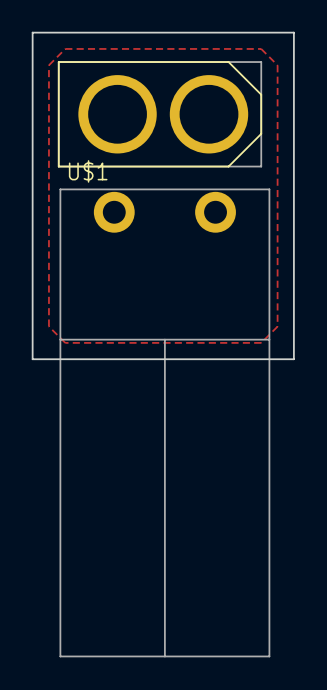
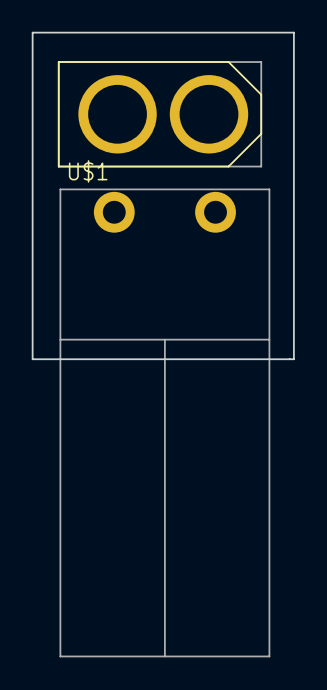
zone outline: (65, 48) (261, 48) (277, 65) (277, 326) (261, 342) (65, 342) (48, 326) (48, 65) (65, 48) -> none

